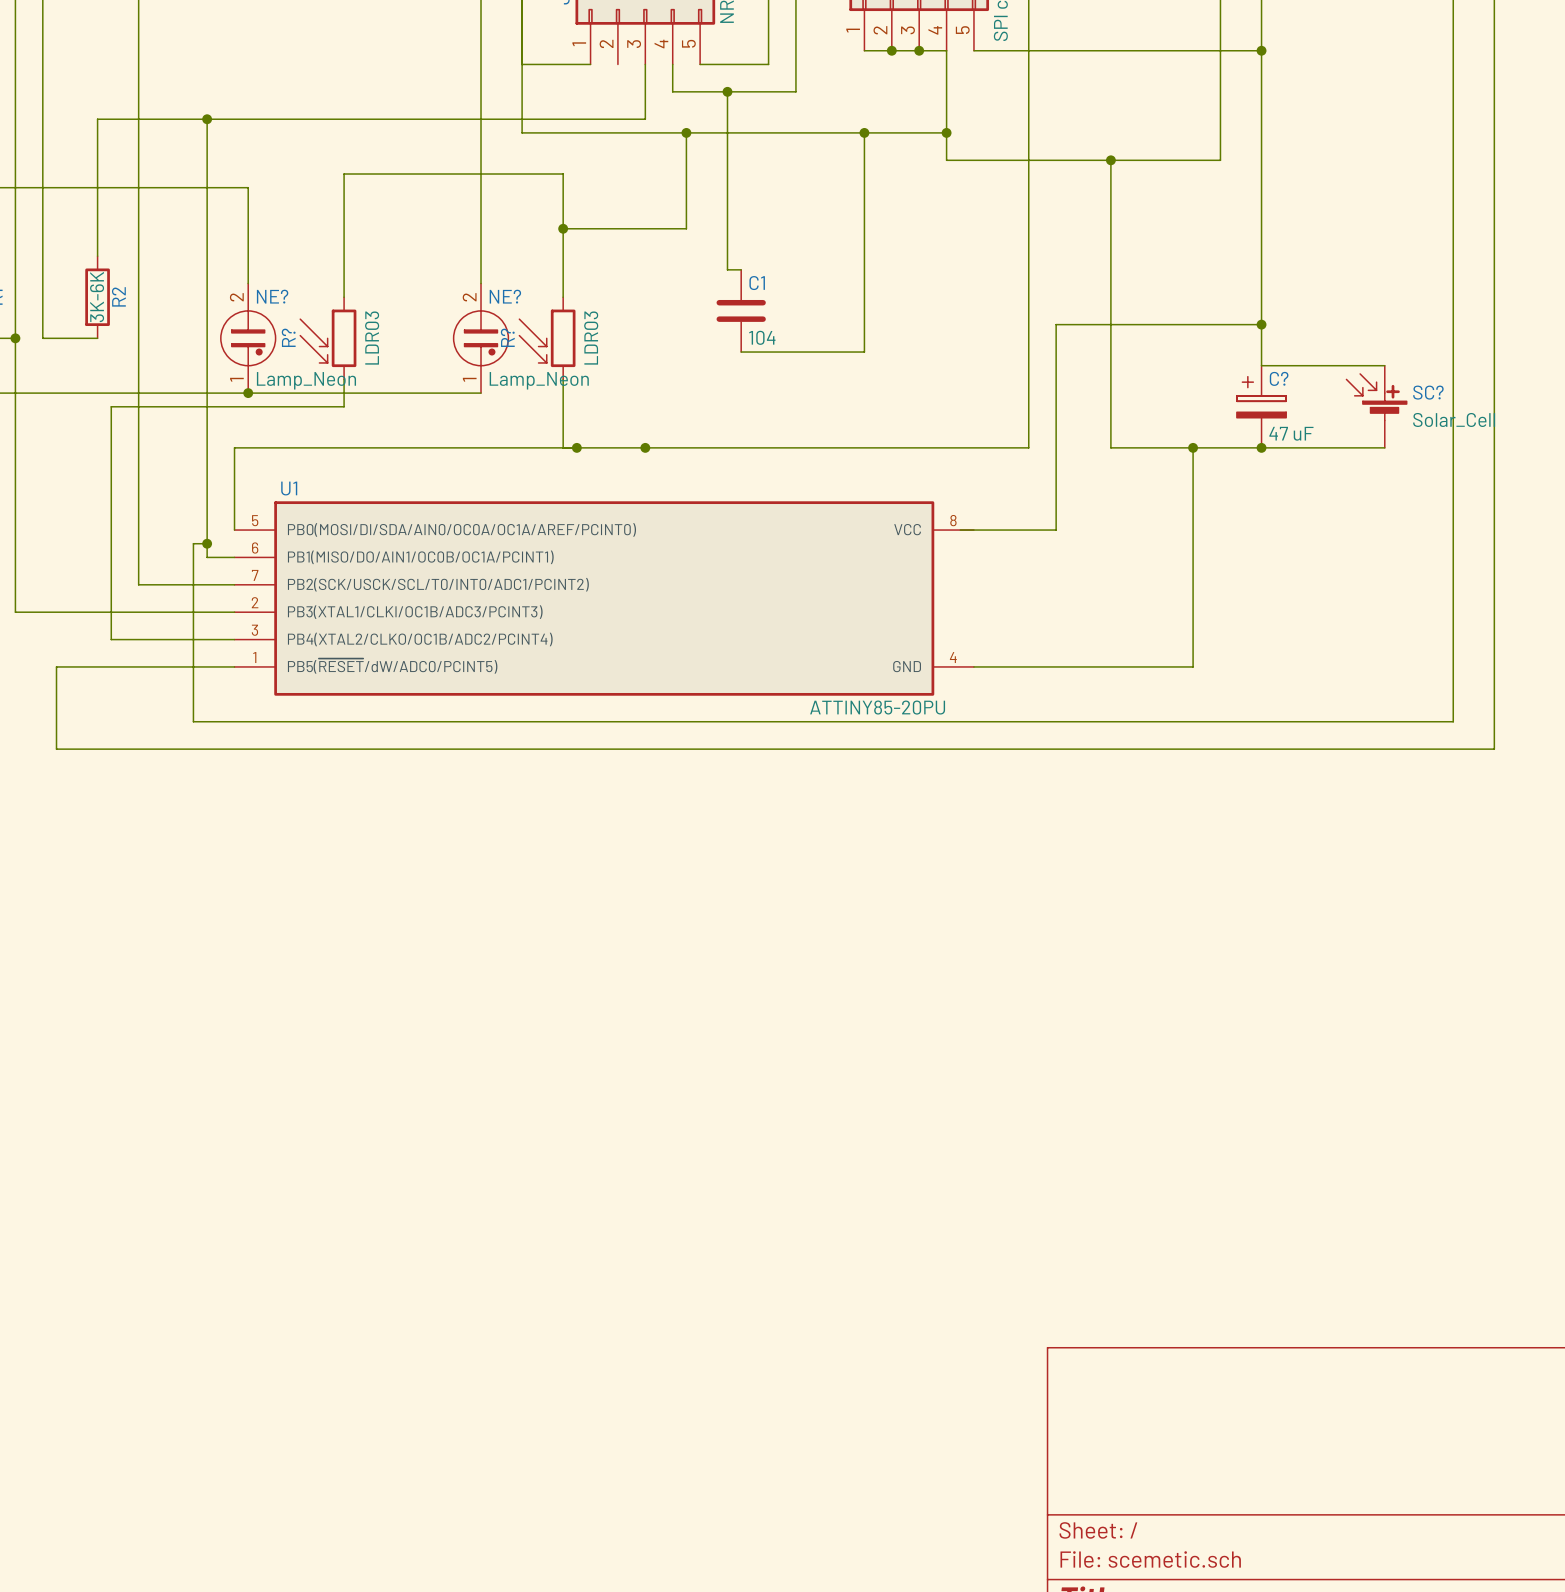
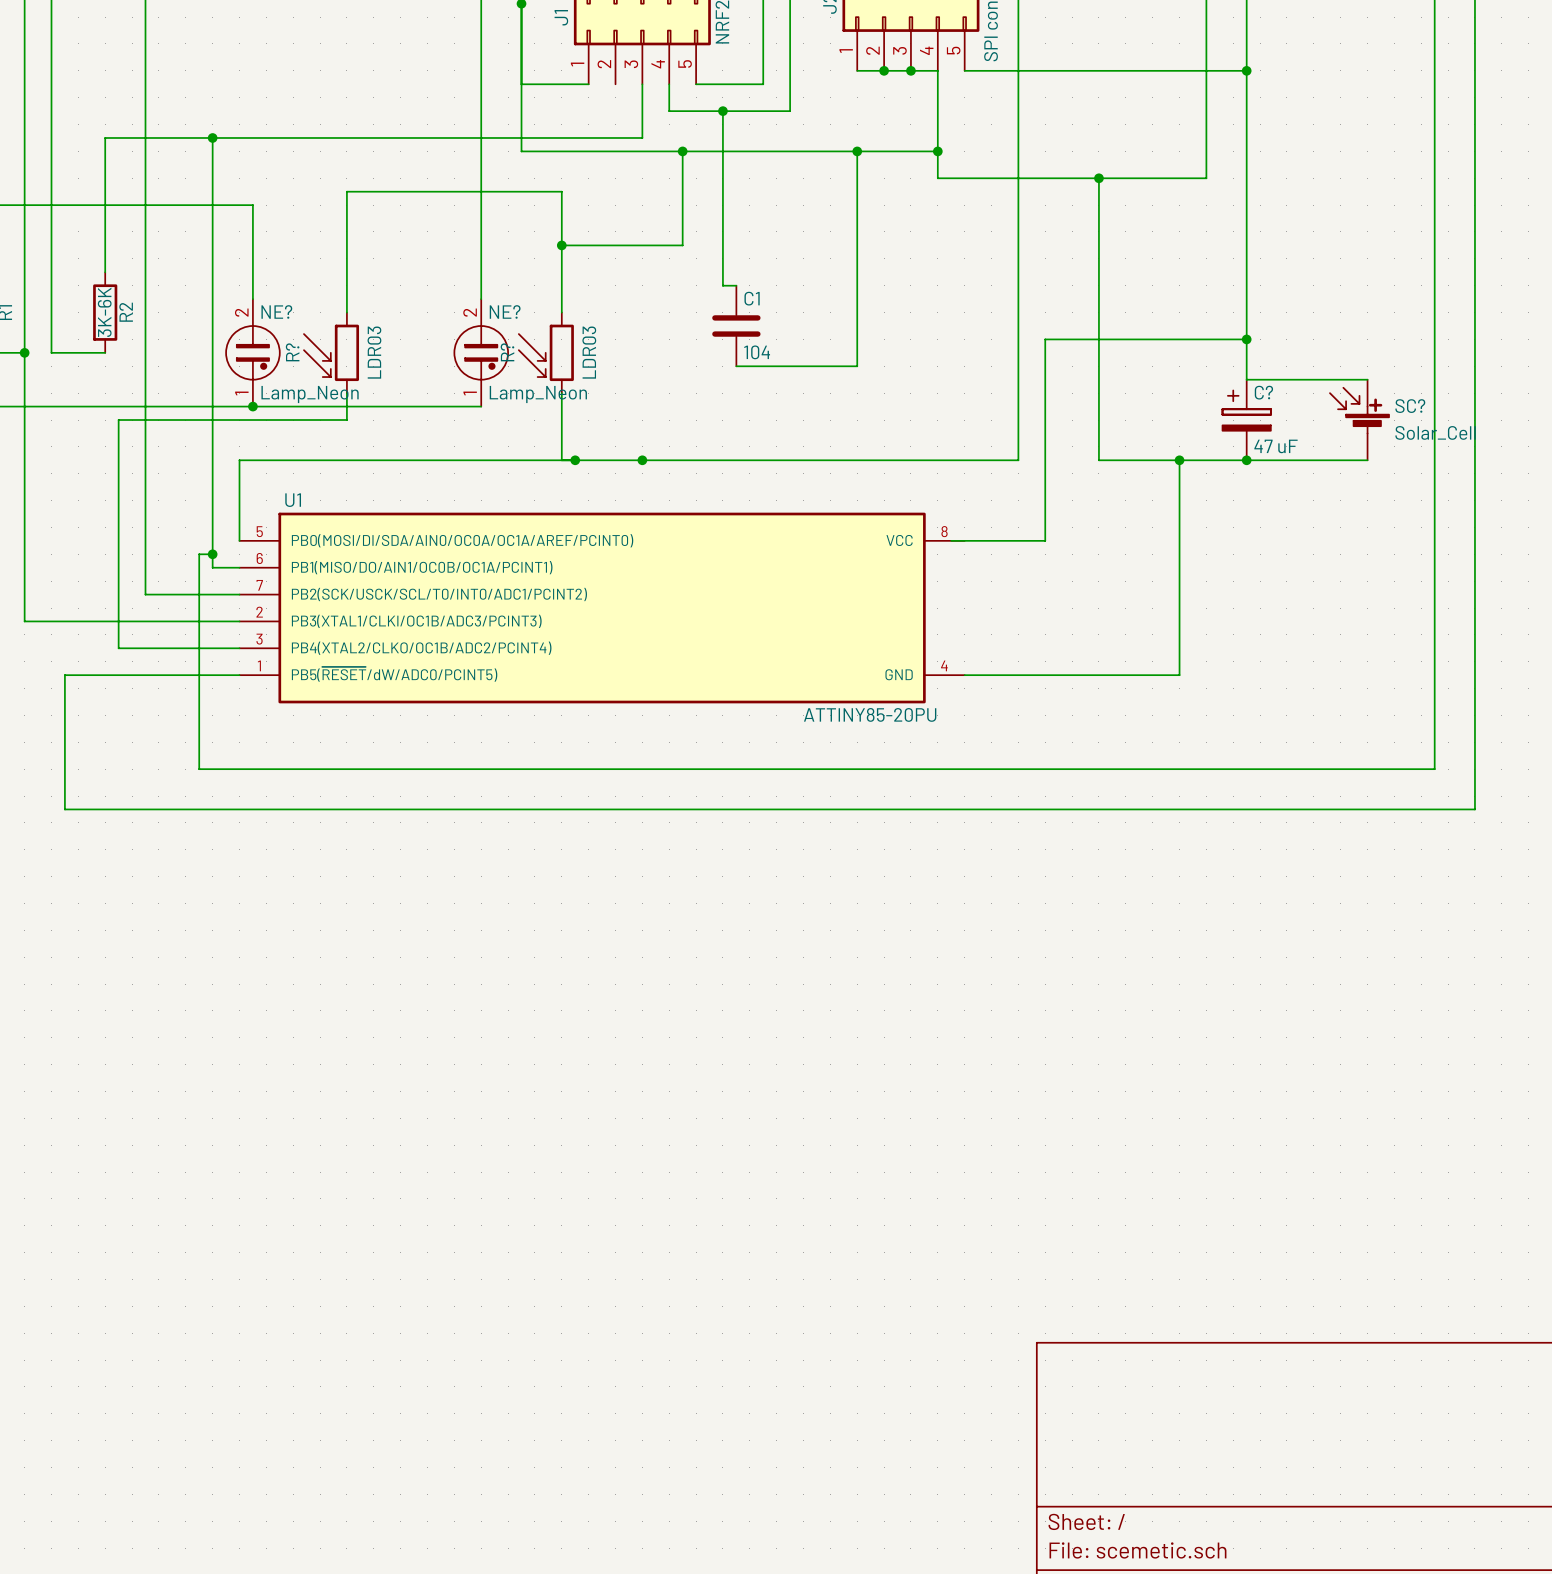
wire: (193, 721) (1453, 721) -> (199, 728) (199, 769) (1434, 769) (1434, 728)
wire: (56, 749) (1494, 749) -> (64, 755) (64, 809) (1474, 809) (1474, 755)

